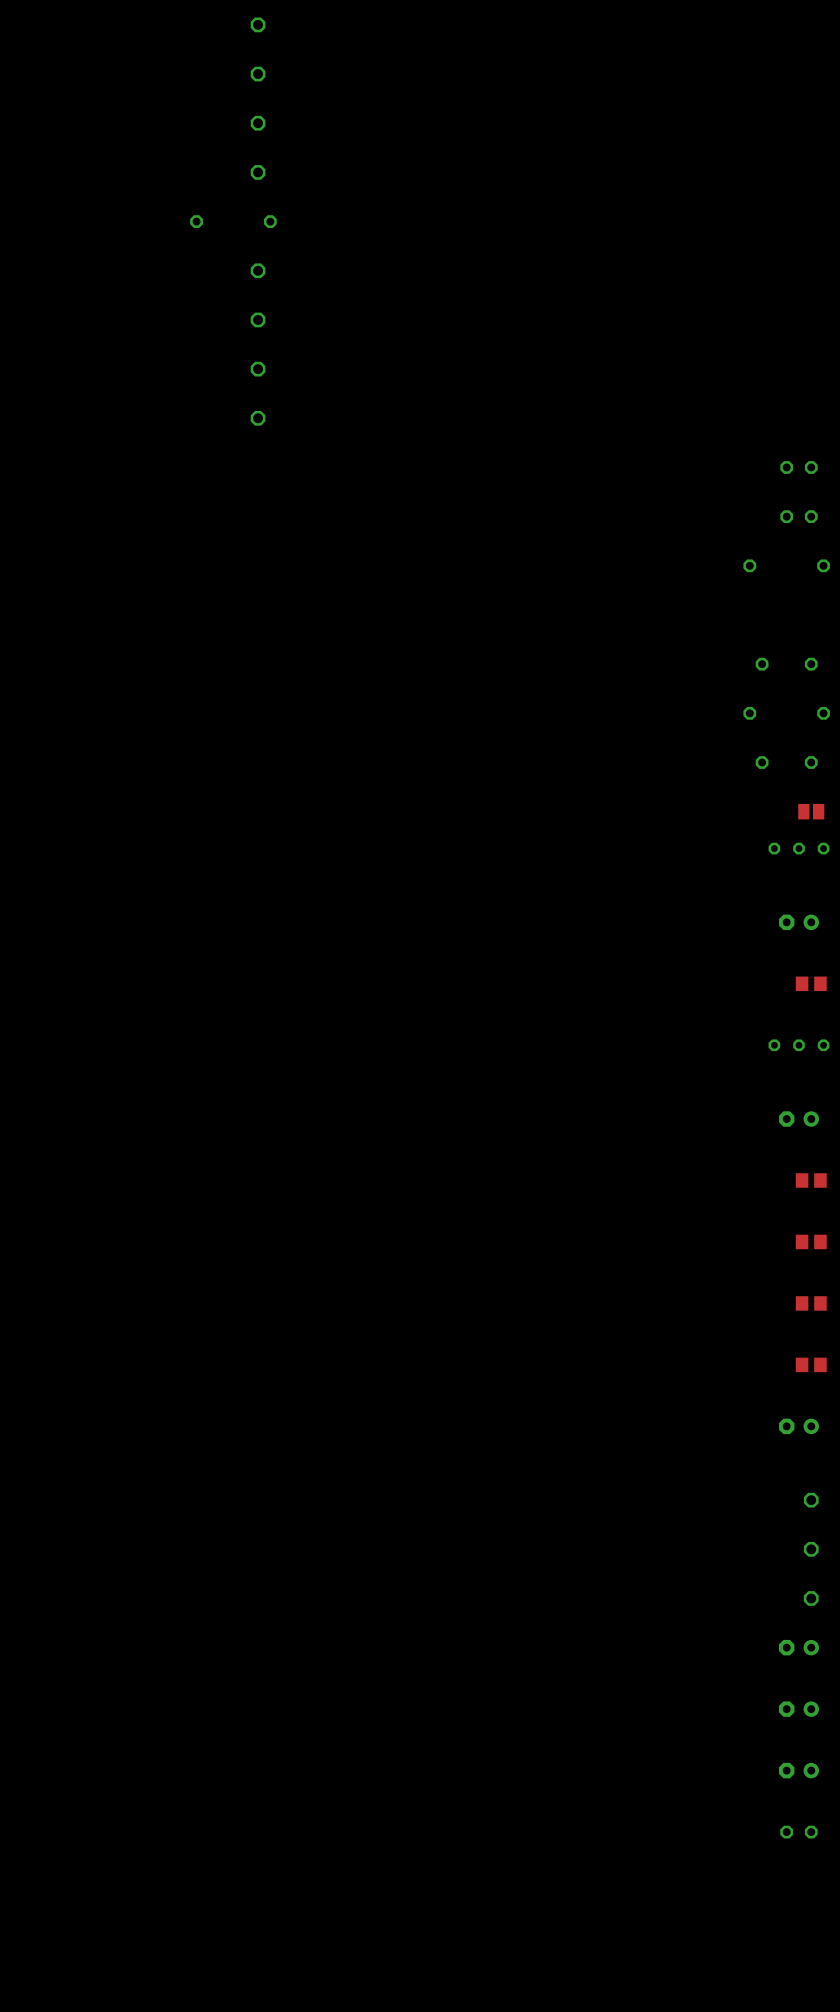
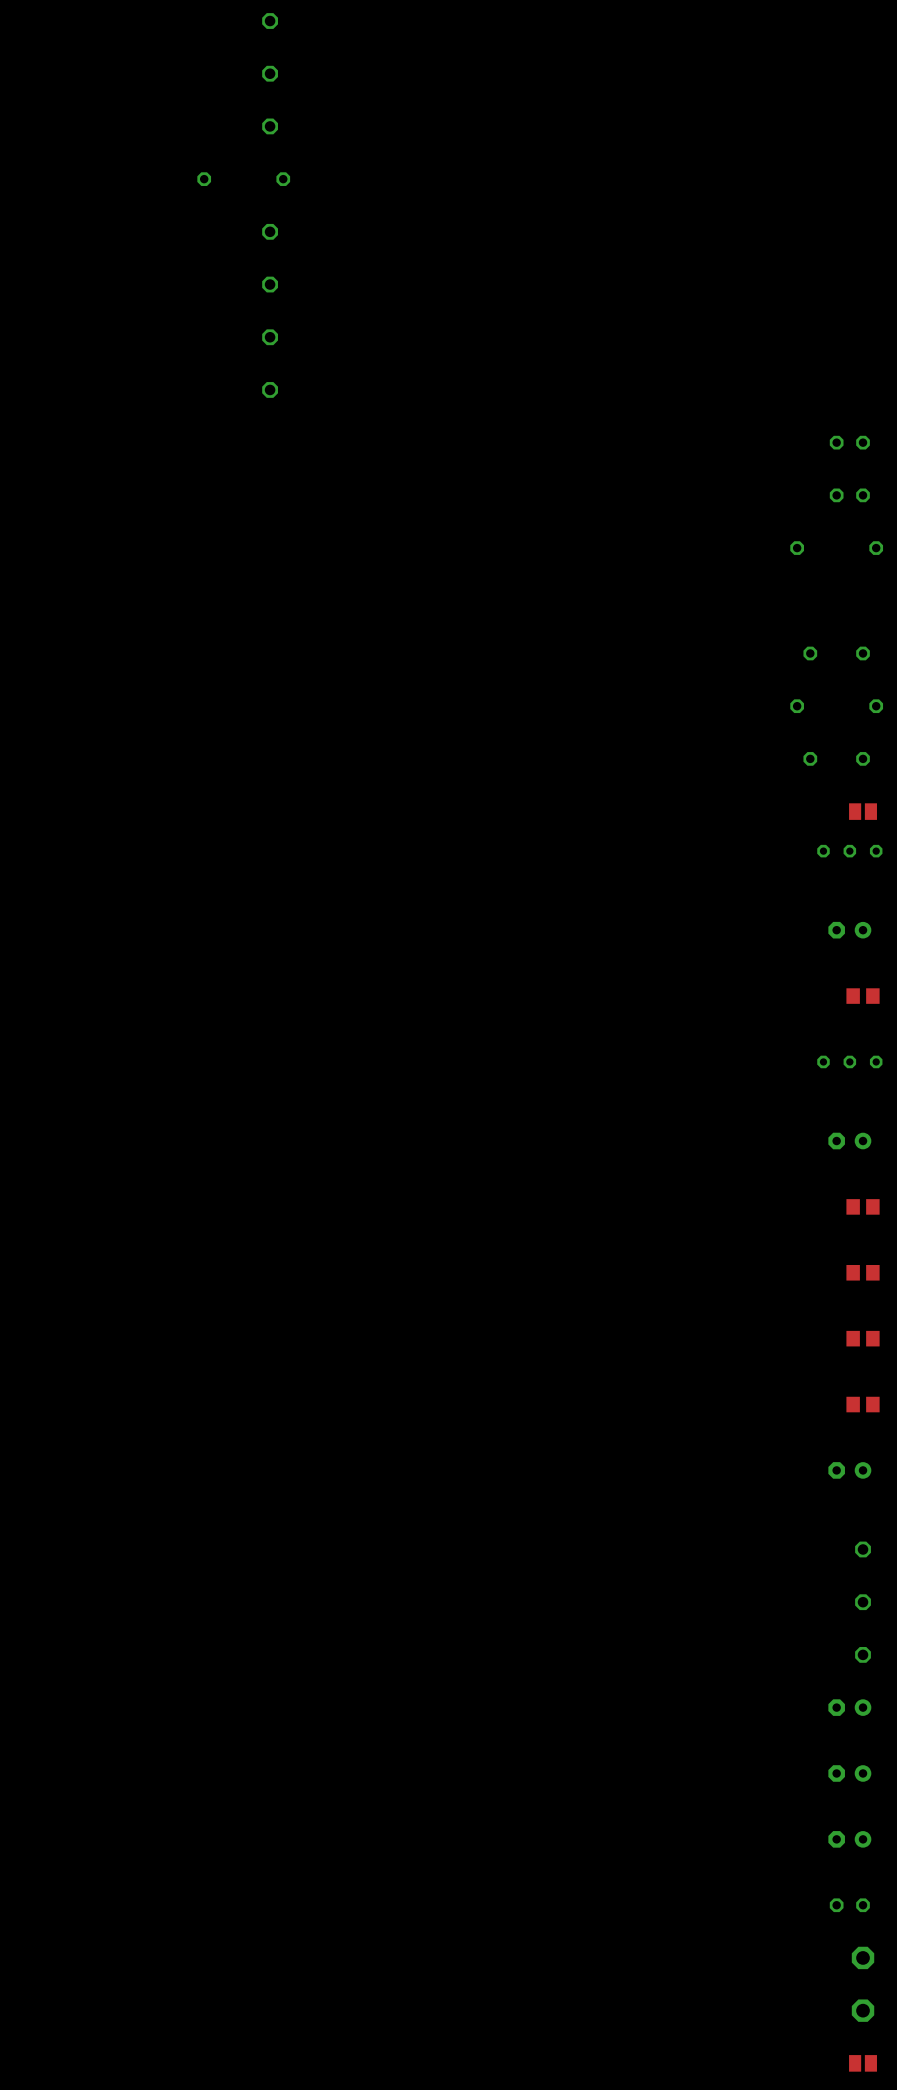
part: none -> (863, 1957)
part: none -> (863, 2010)
part: none -> (863, 2063)

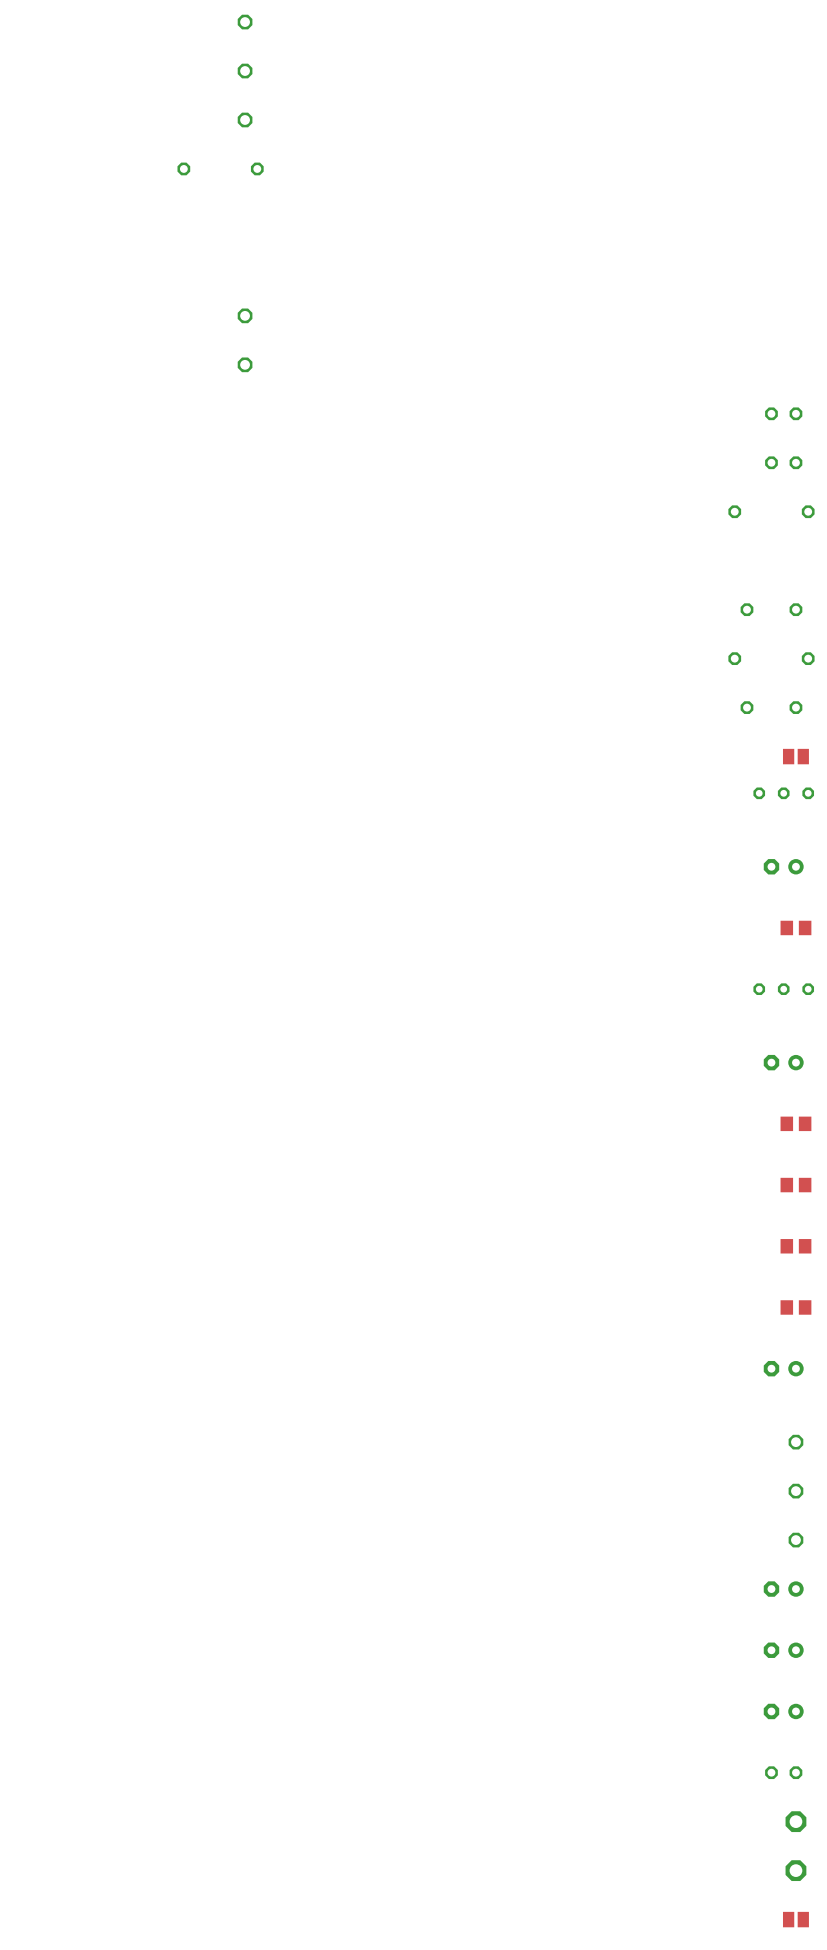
part: (270, 231) -> none
part: (270, 284) -> none

